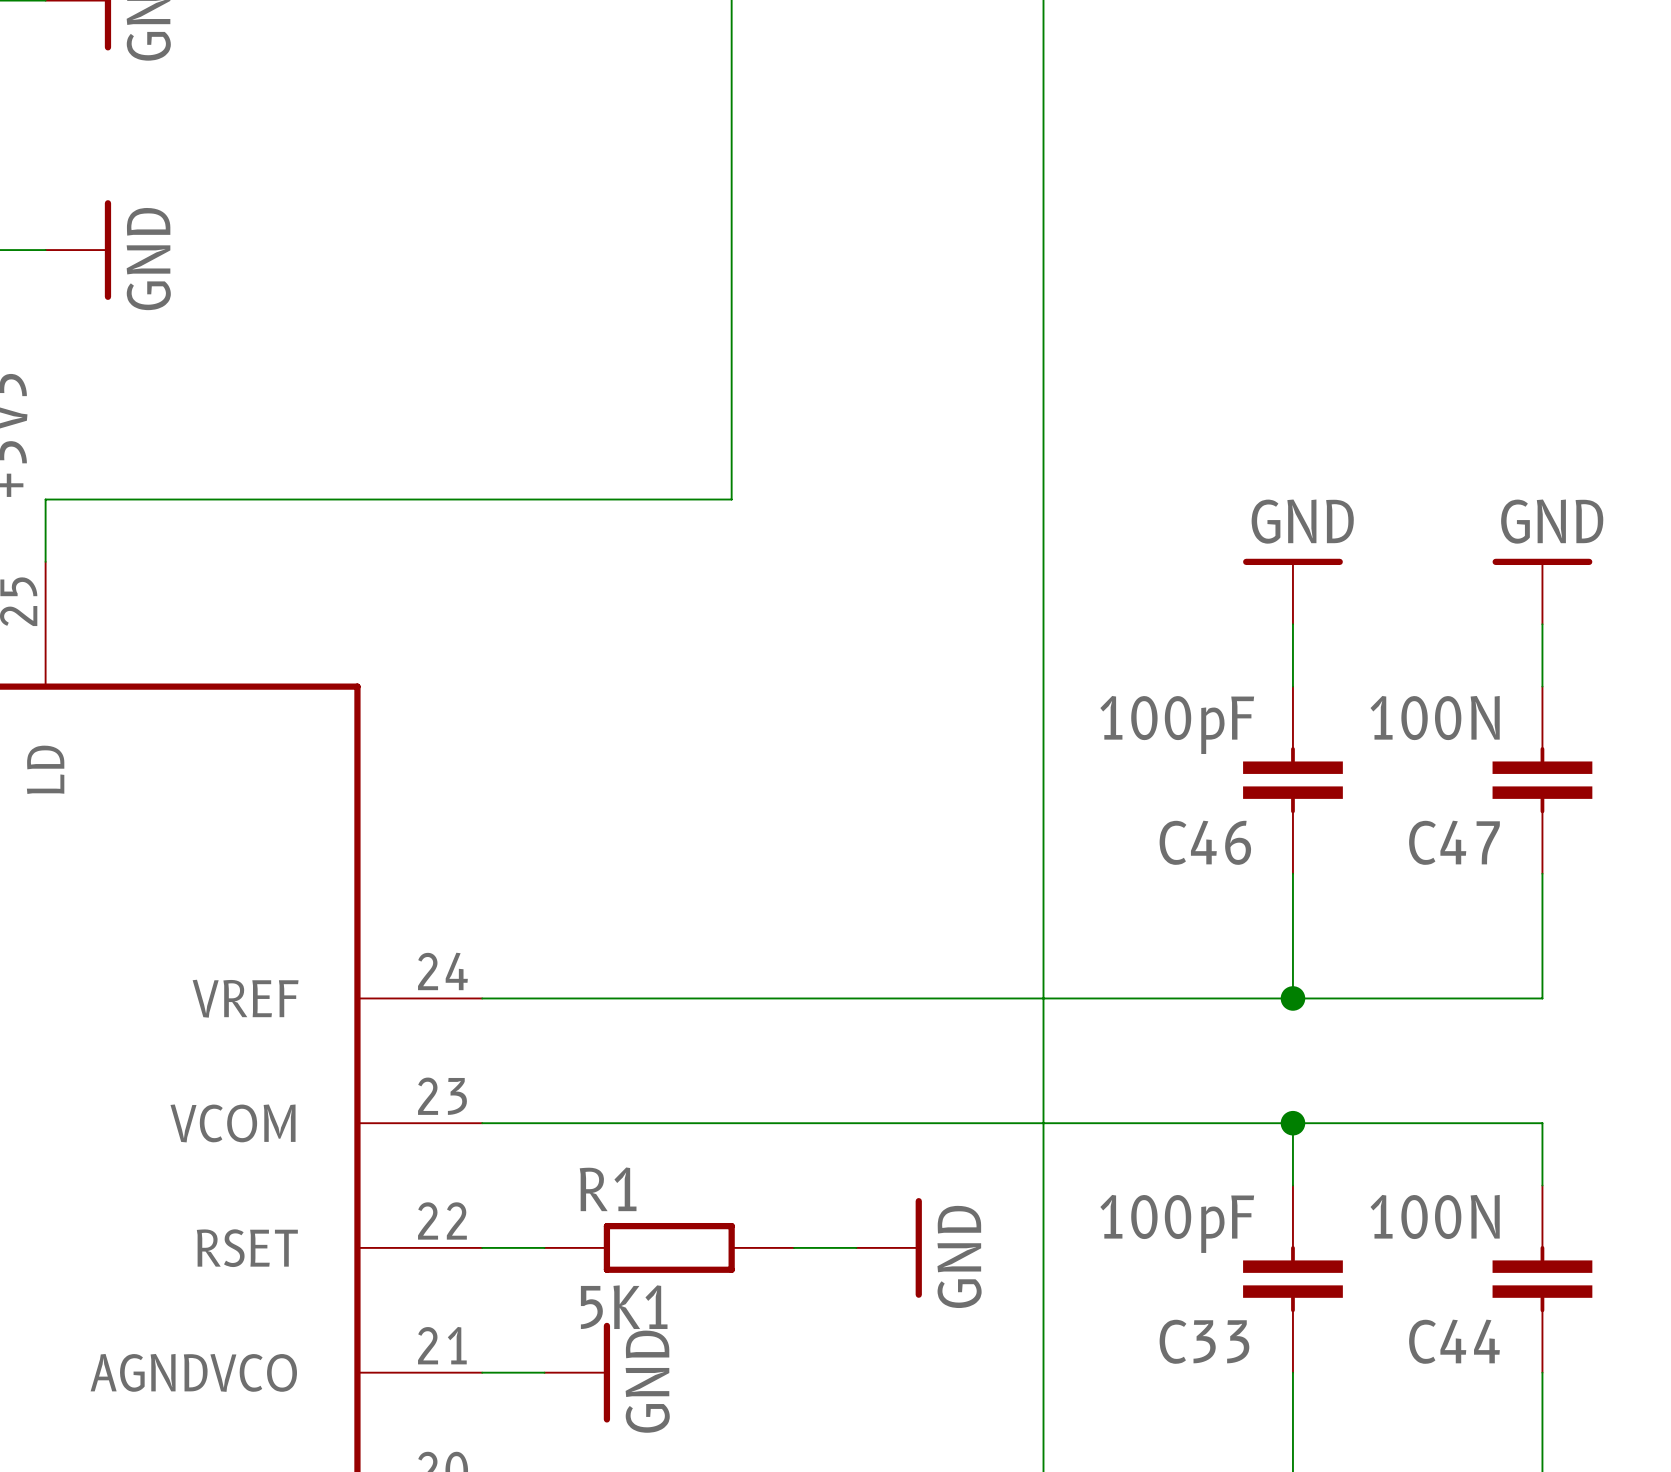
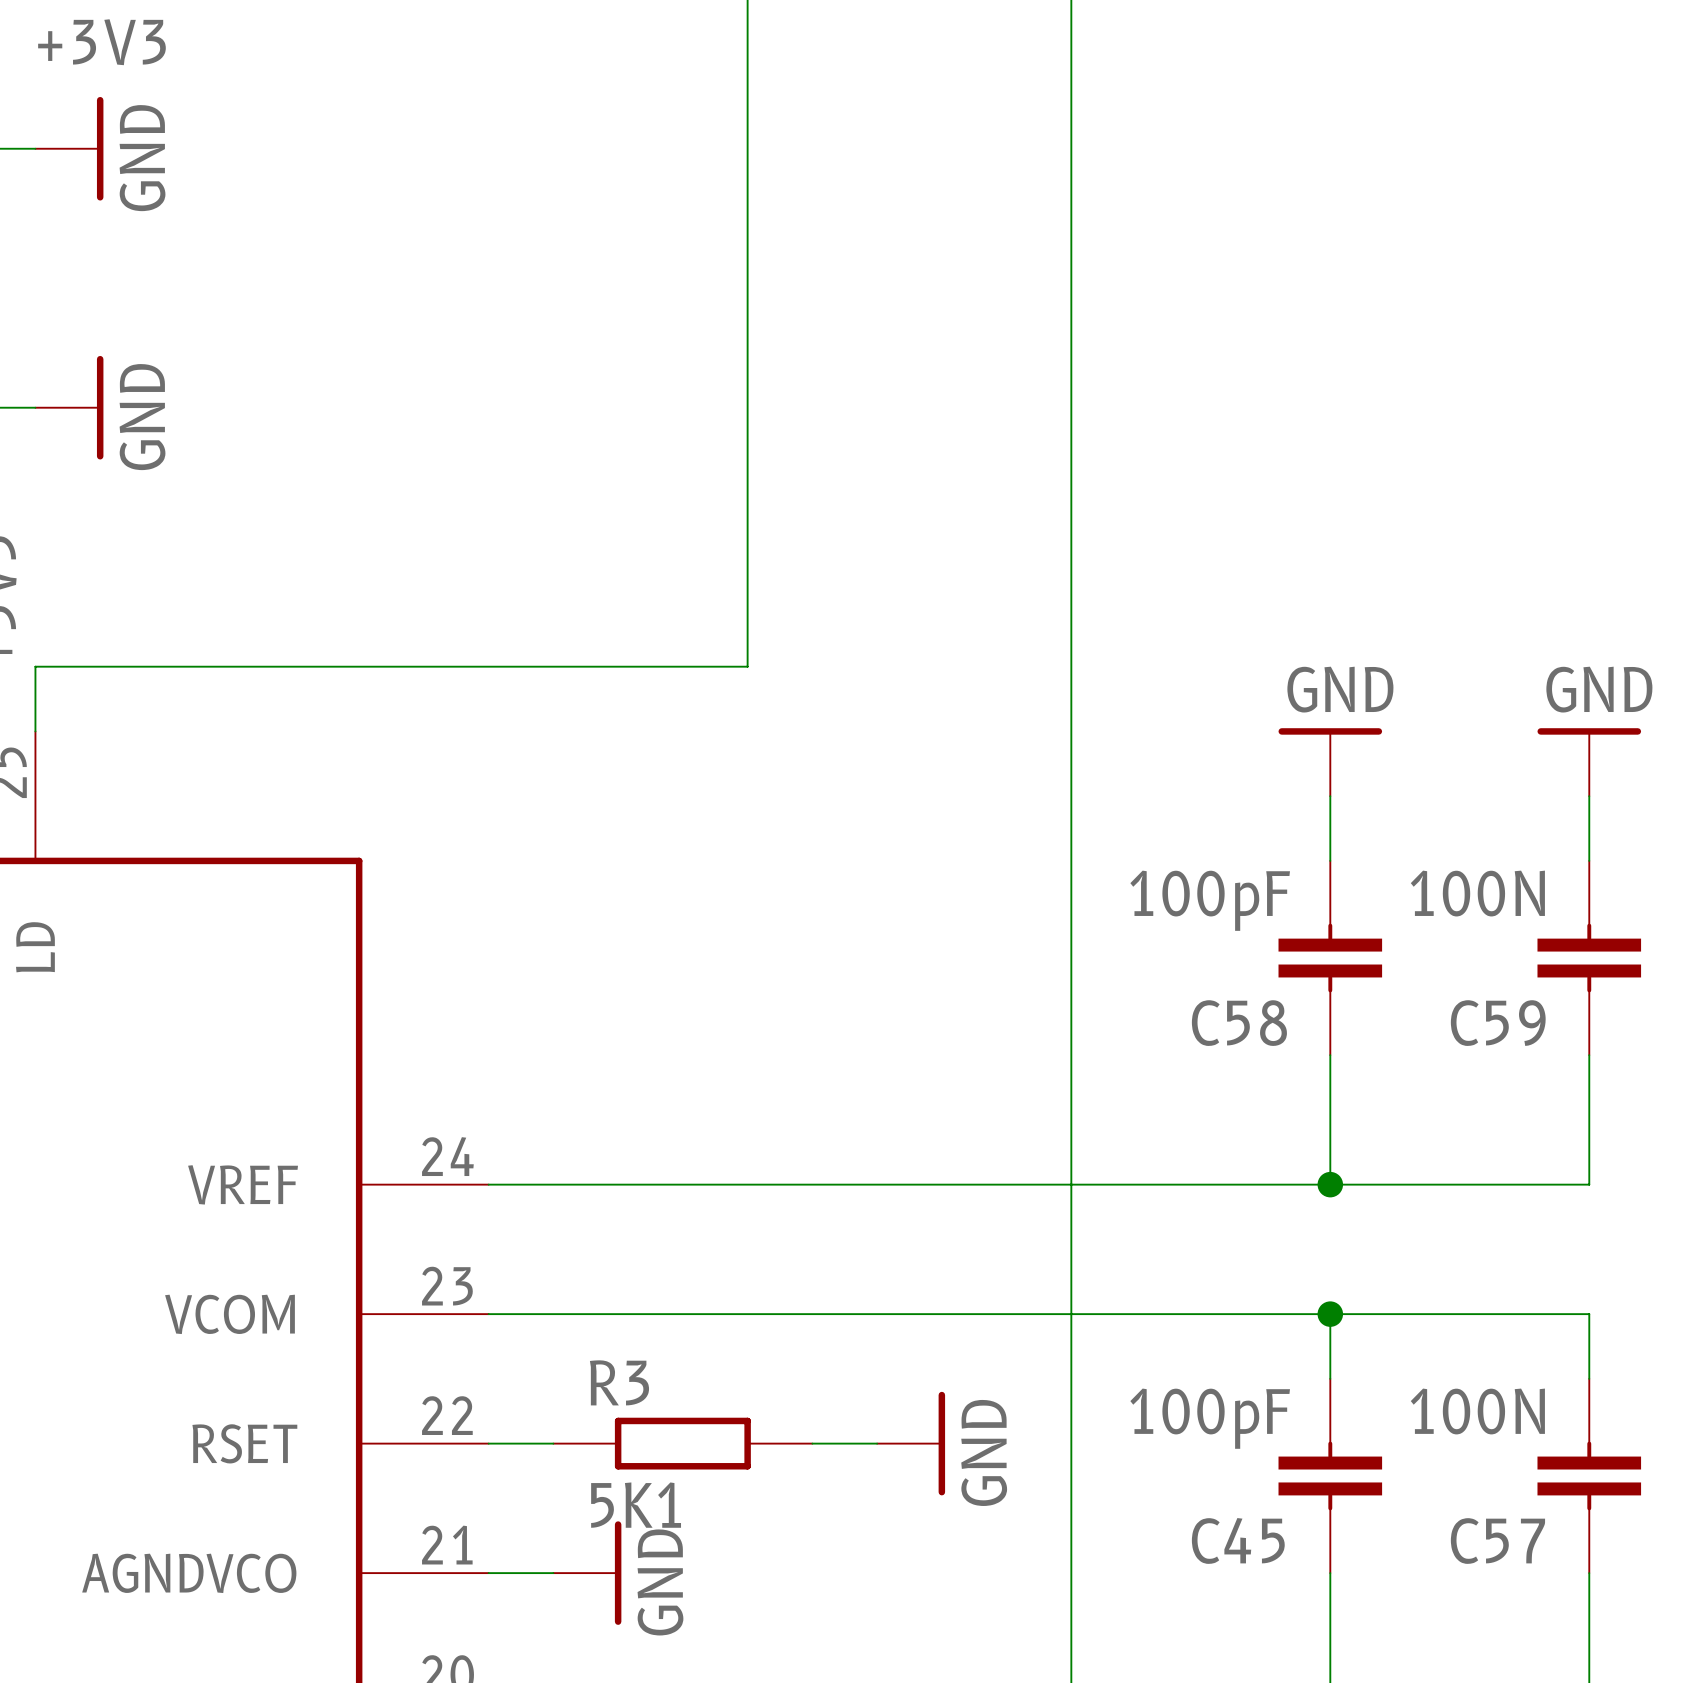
C46 name: C46 (1205, 842) -> C58 (1239, 1023)
C47 name: C47 (1454, 842) -> C59 (1498, 1023)
R1 name: R1 (608, 1189) -> R3 (619, 1382)
C33 name: C33 (1204, 1341) -> C45 (1238, 1540)
C44 name: C44 (1454, 1341) -> C57 (1497, 1541)

